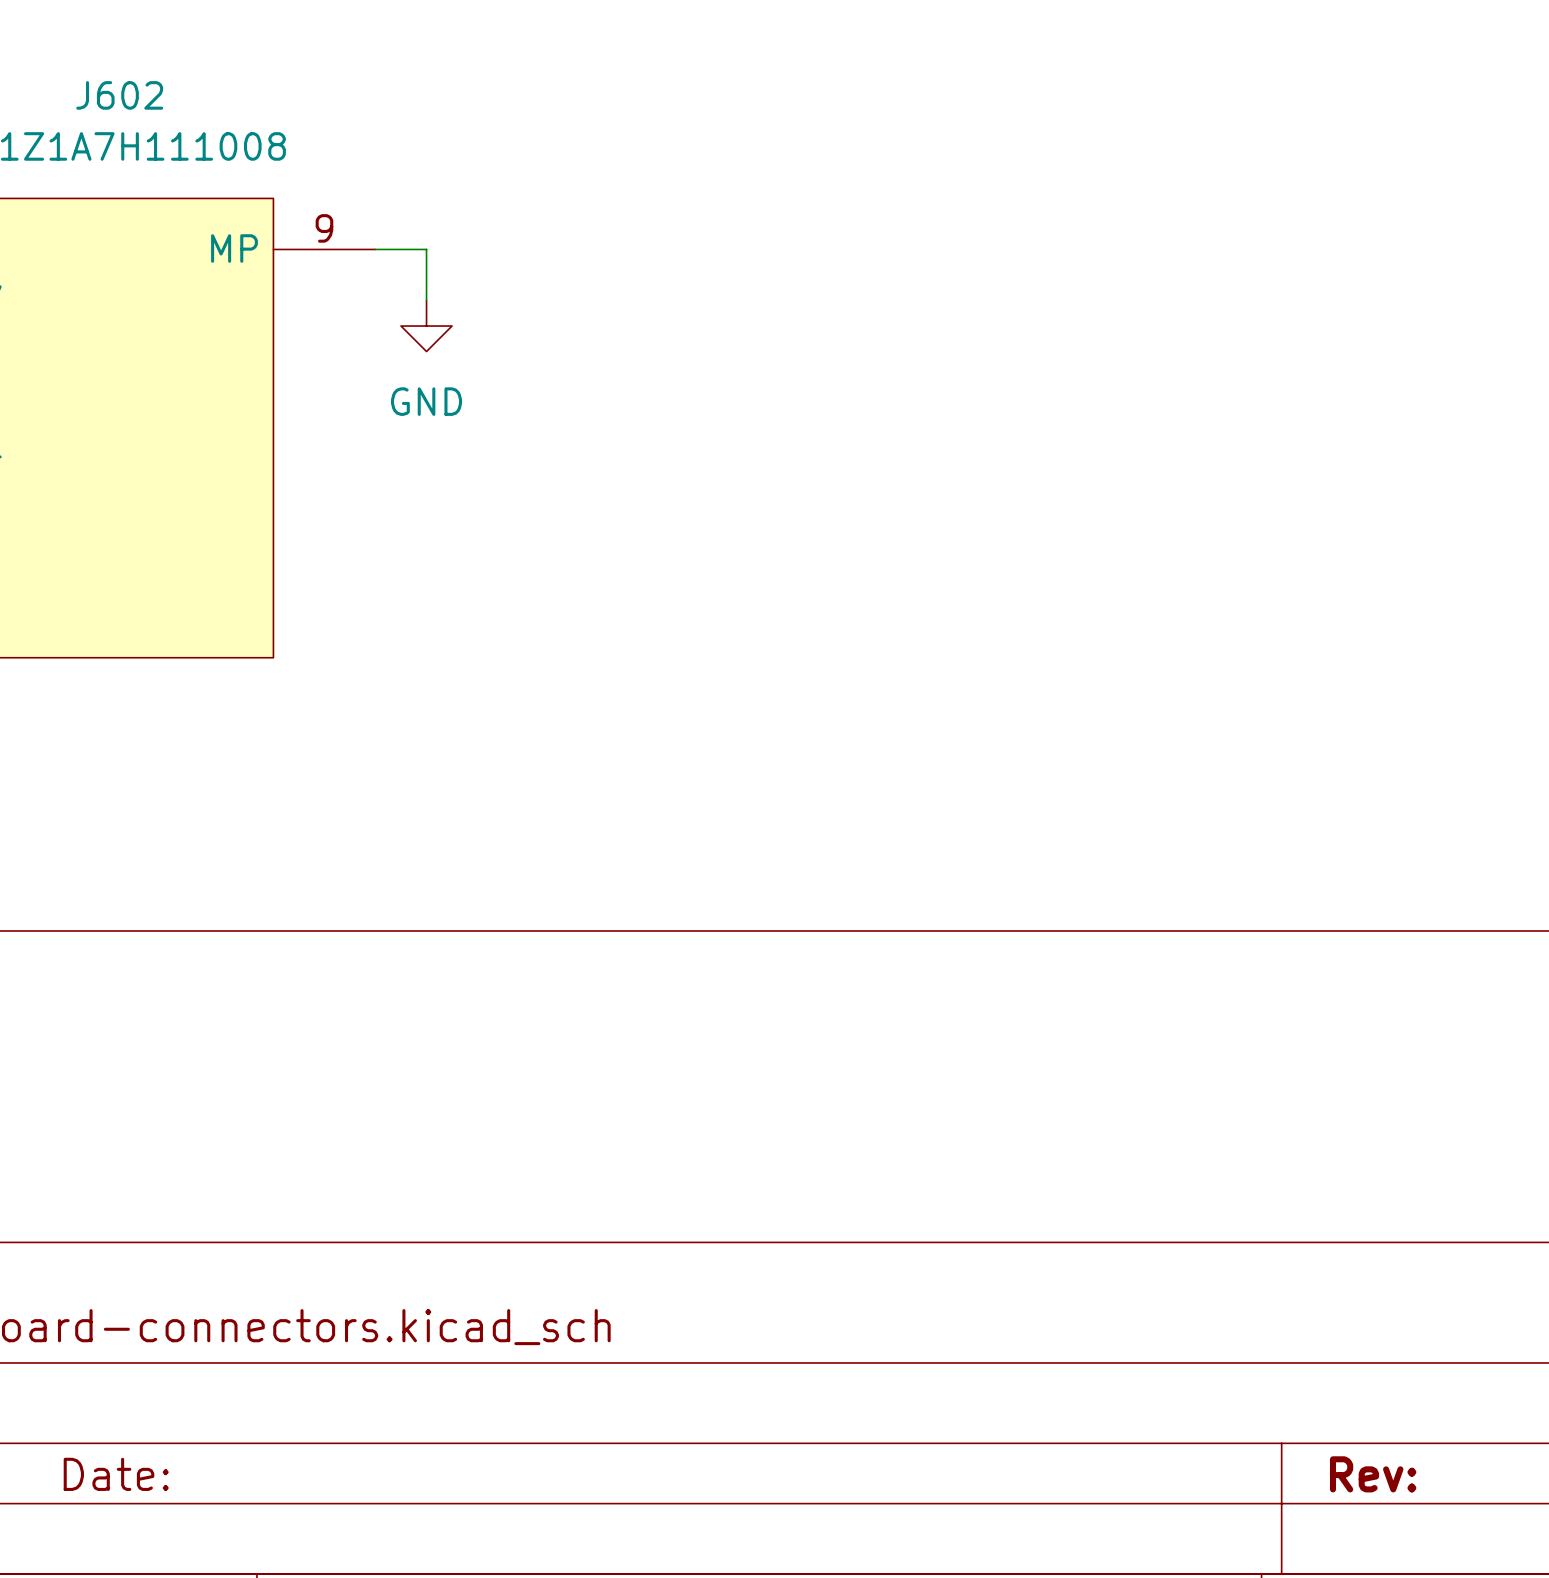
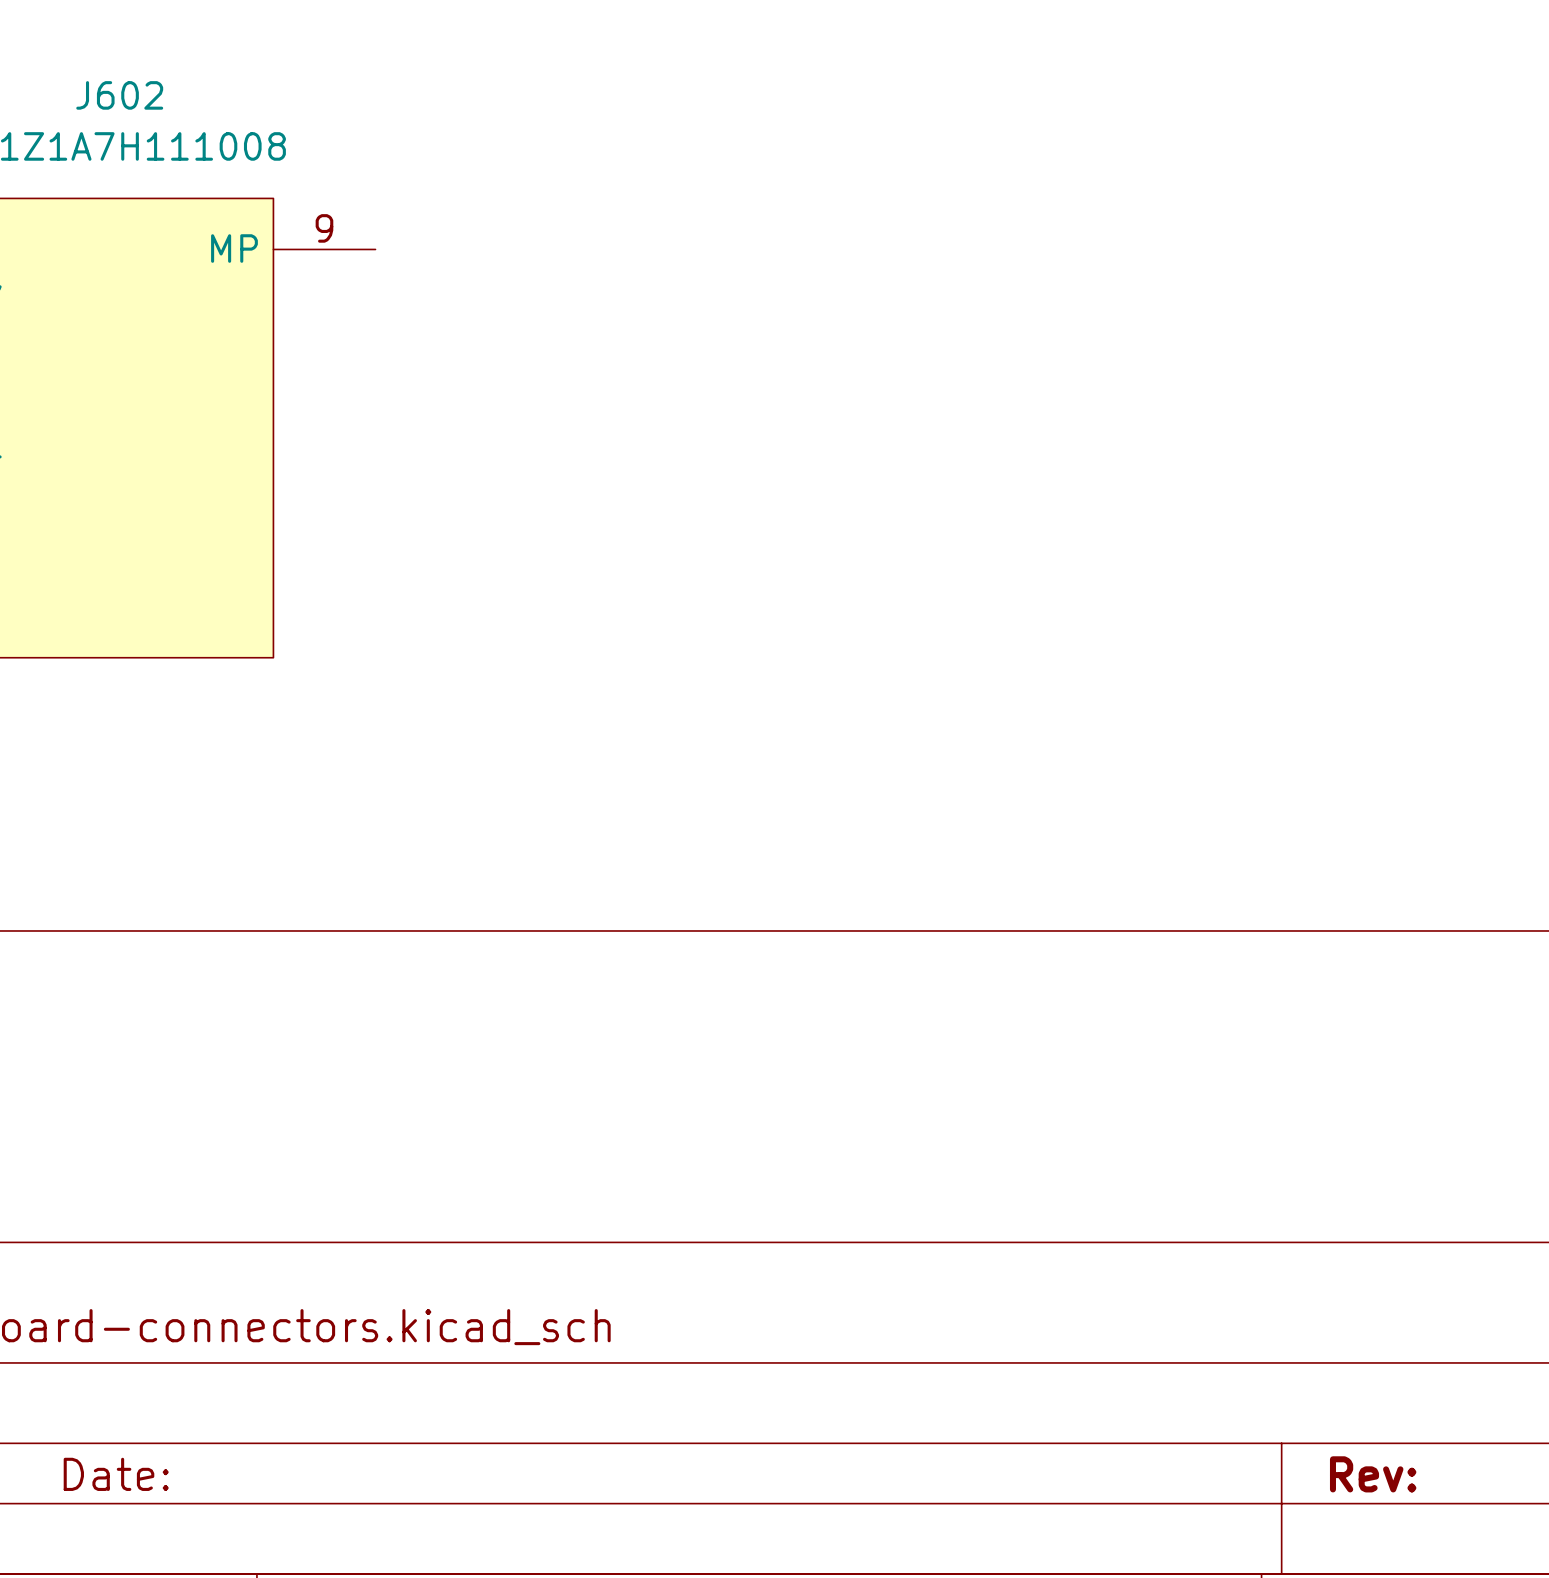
wire: (375, 249) (426, 249) (426, 300) -> none
power symbol: GND (426, 326) -> none

